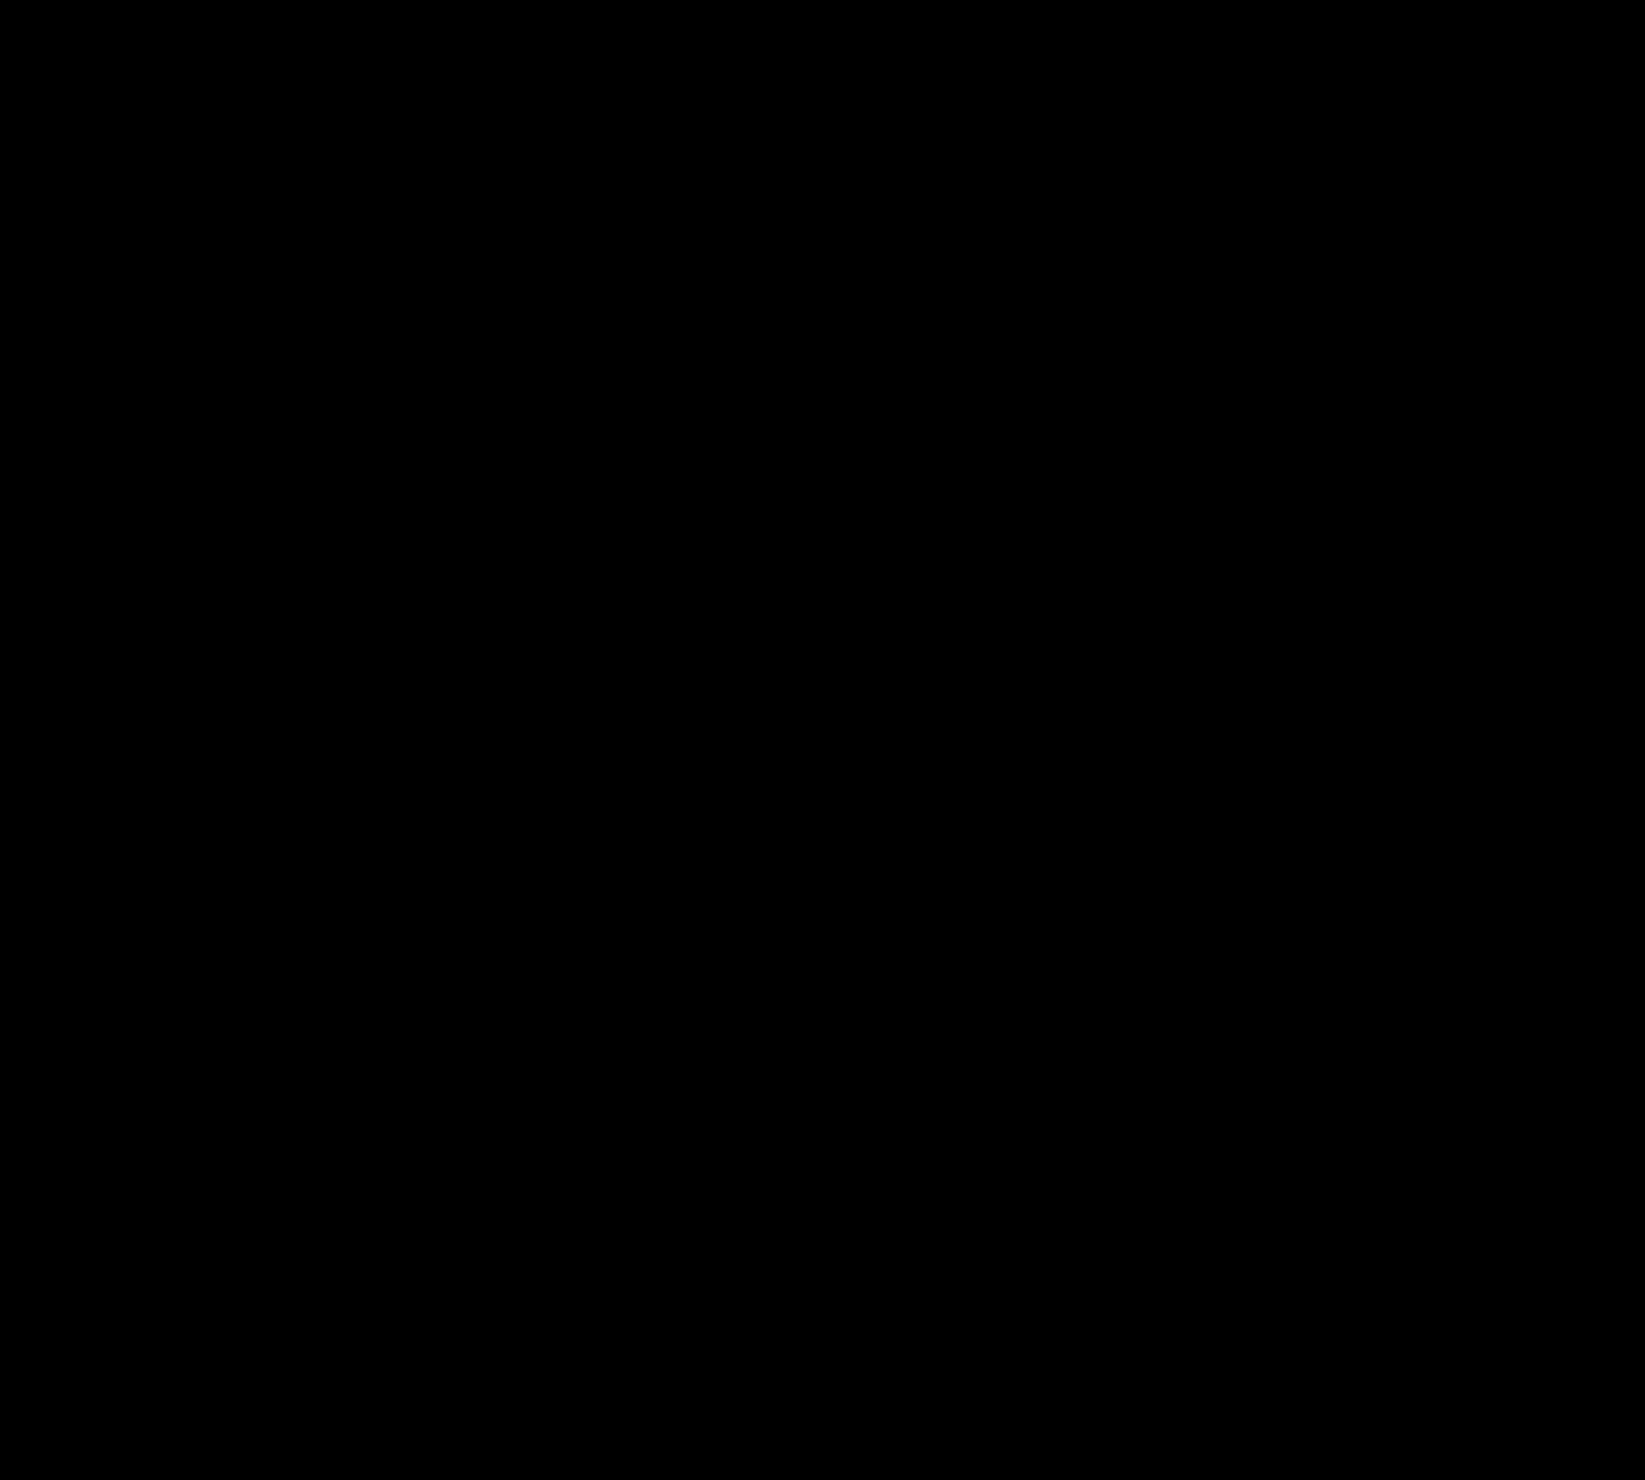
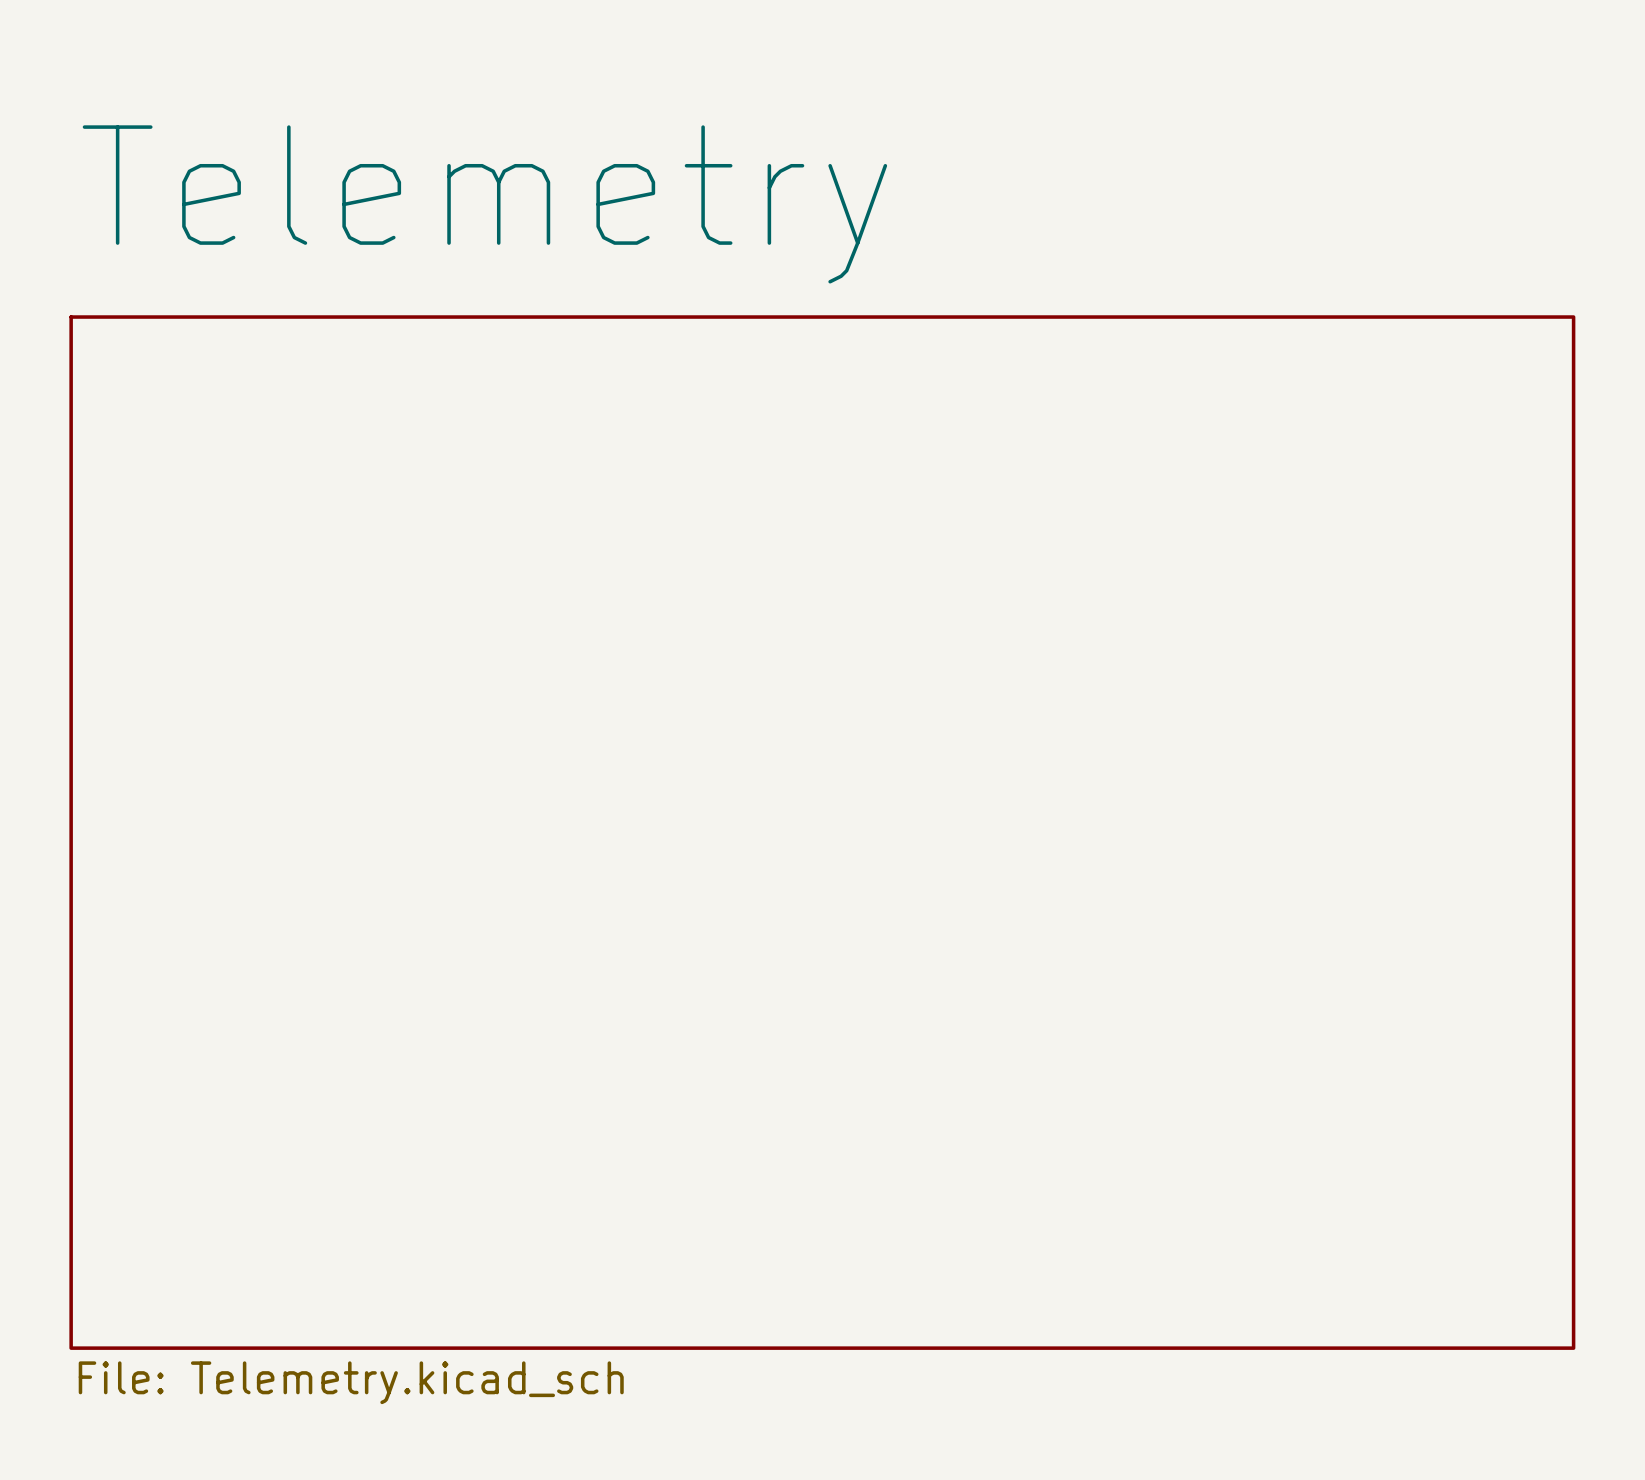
sheet Telemetry: none -> File: Telemetry.kicad_sch (822, 832)

